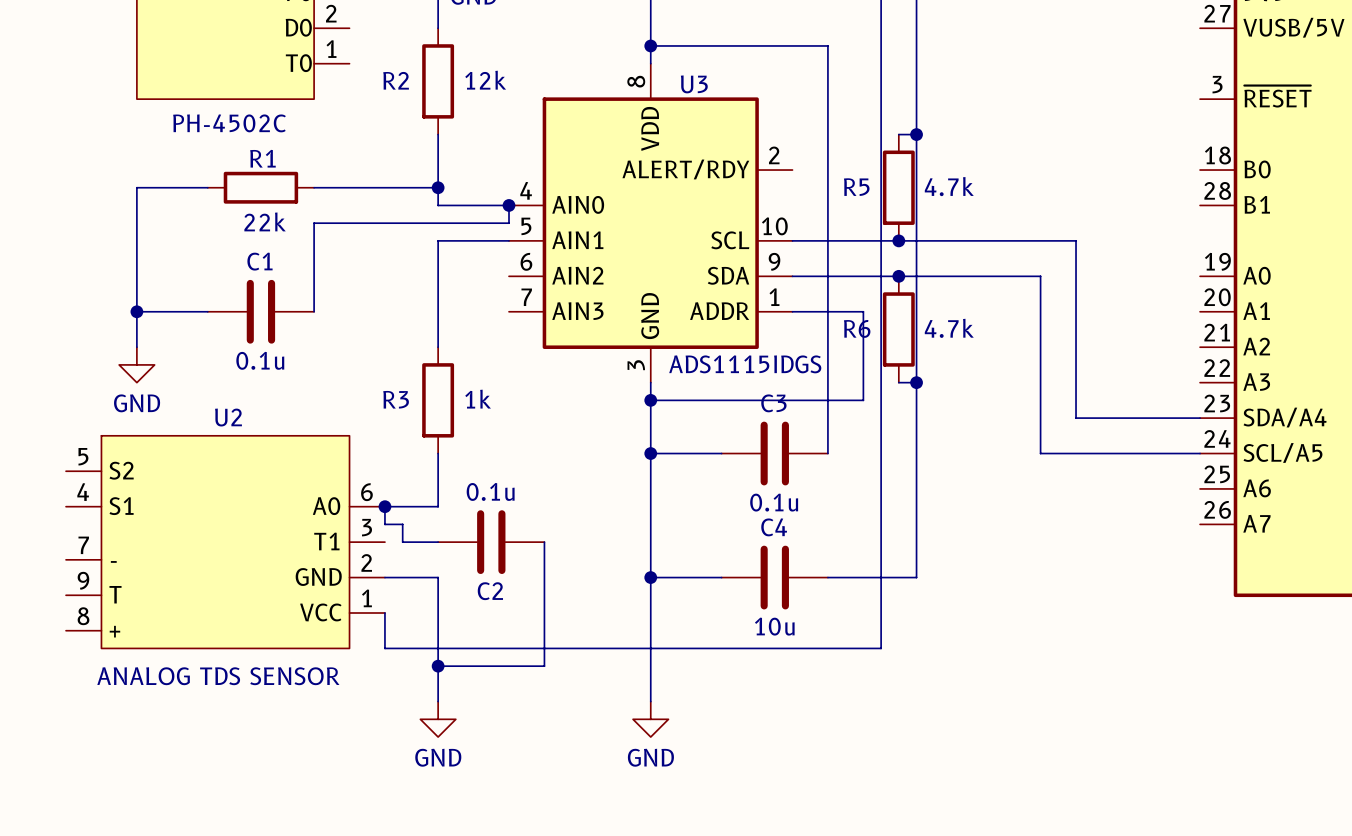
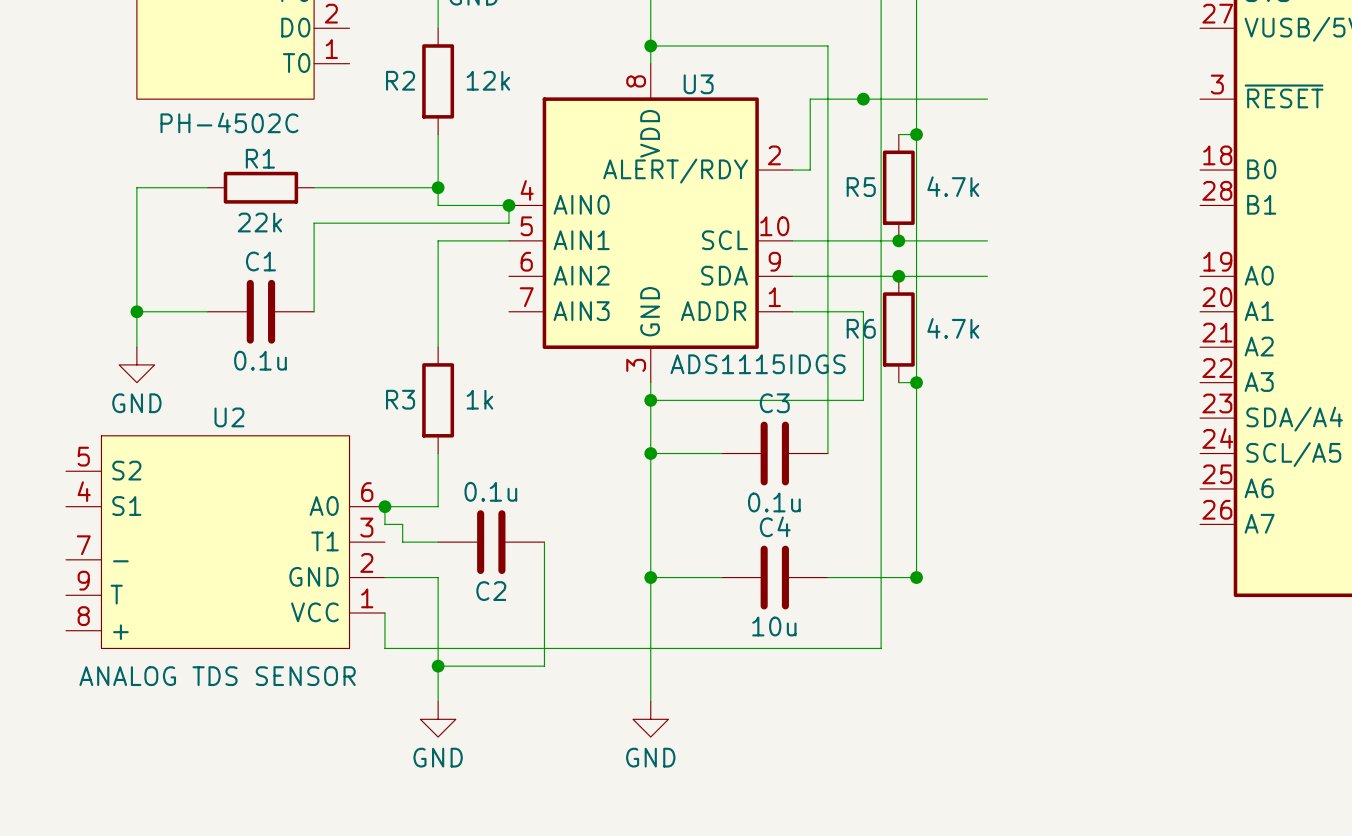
junction: none -> (863, 99)
wire: none -> (987, 99) (810, 99) (810, 170) (792, 170)
wire: (987, 240) (1076, 240) (1076, 418) (1200, 418) -> none
wire: (987, 276) (1040, 276) (1040, 453) (1200, 453) -> none
junction: none -> (916, 577)

